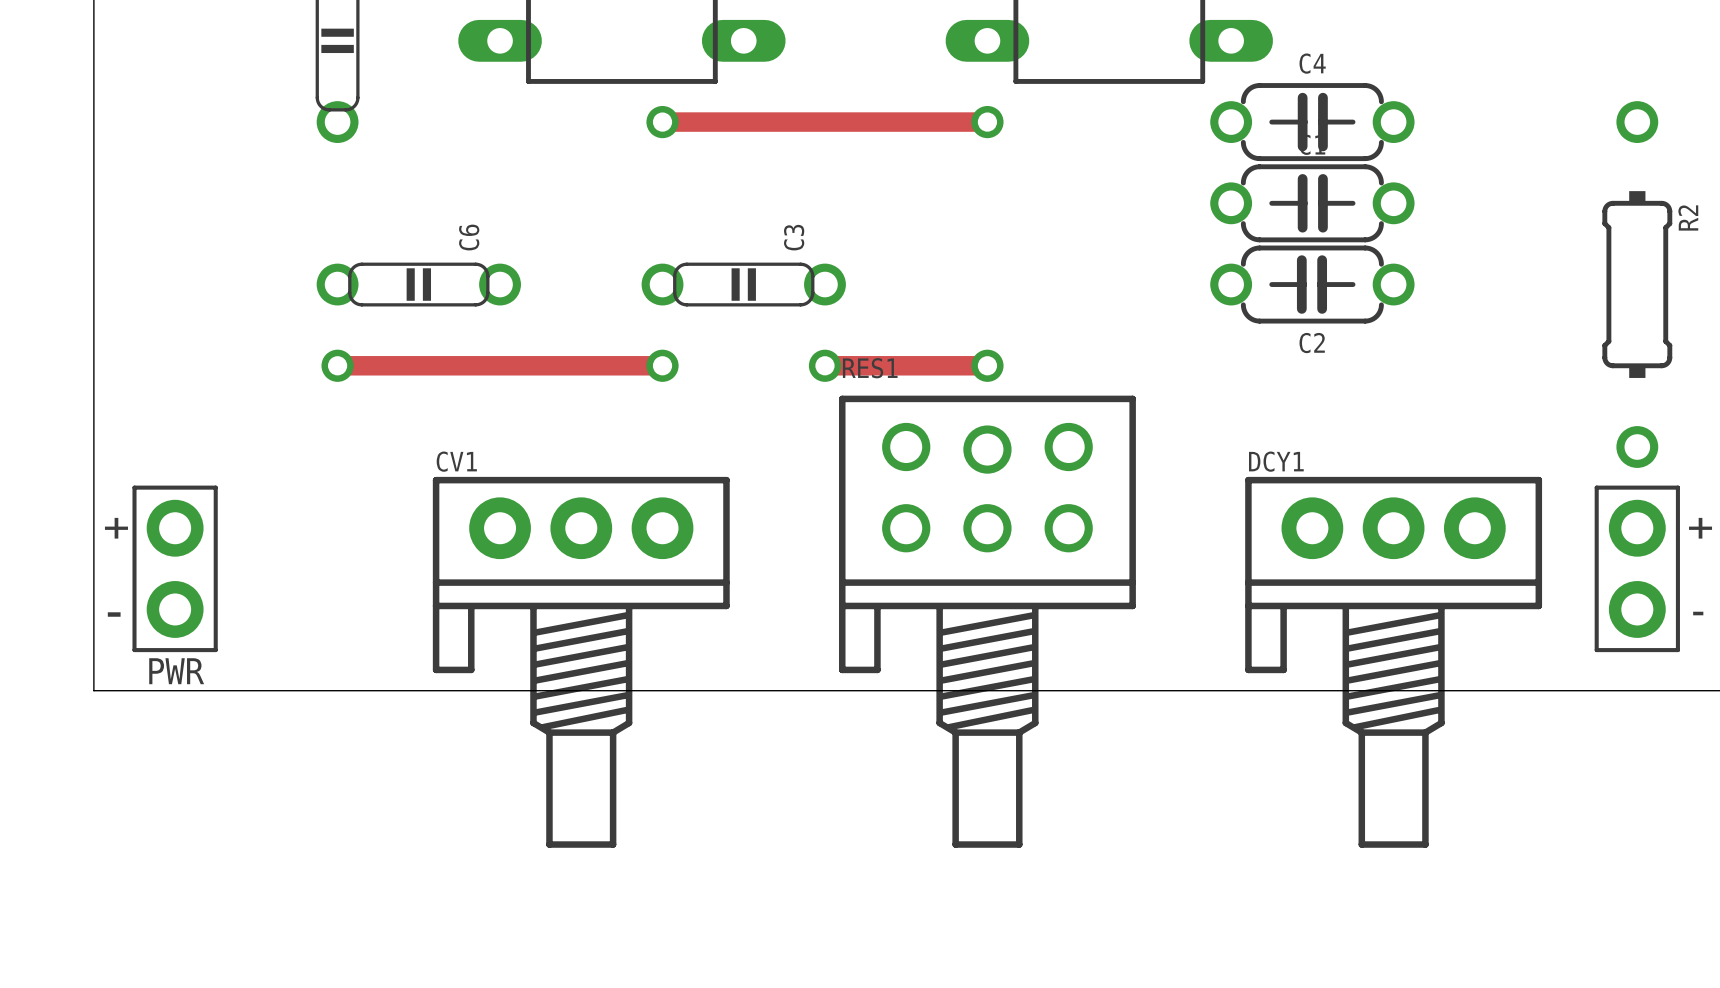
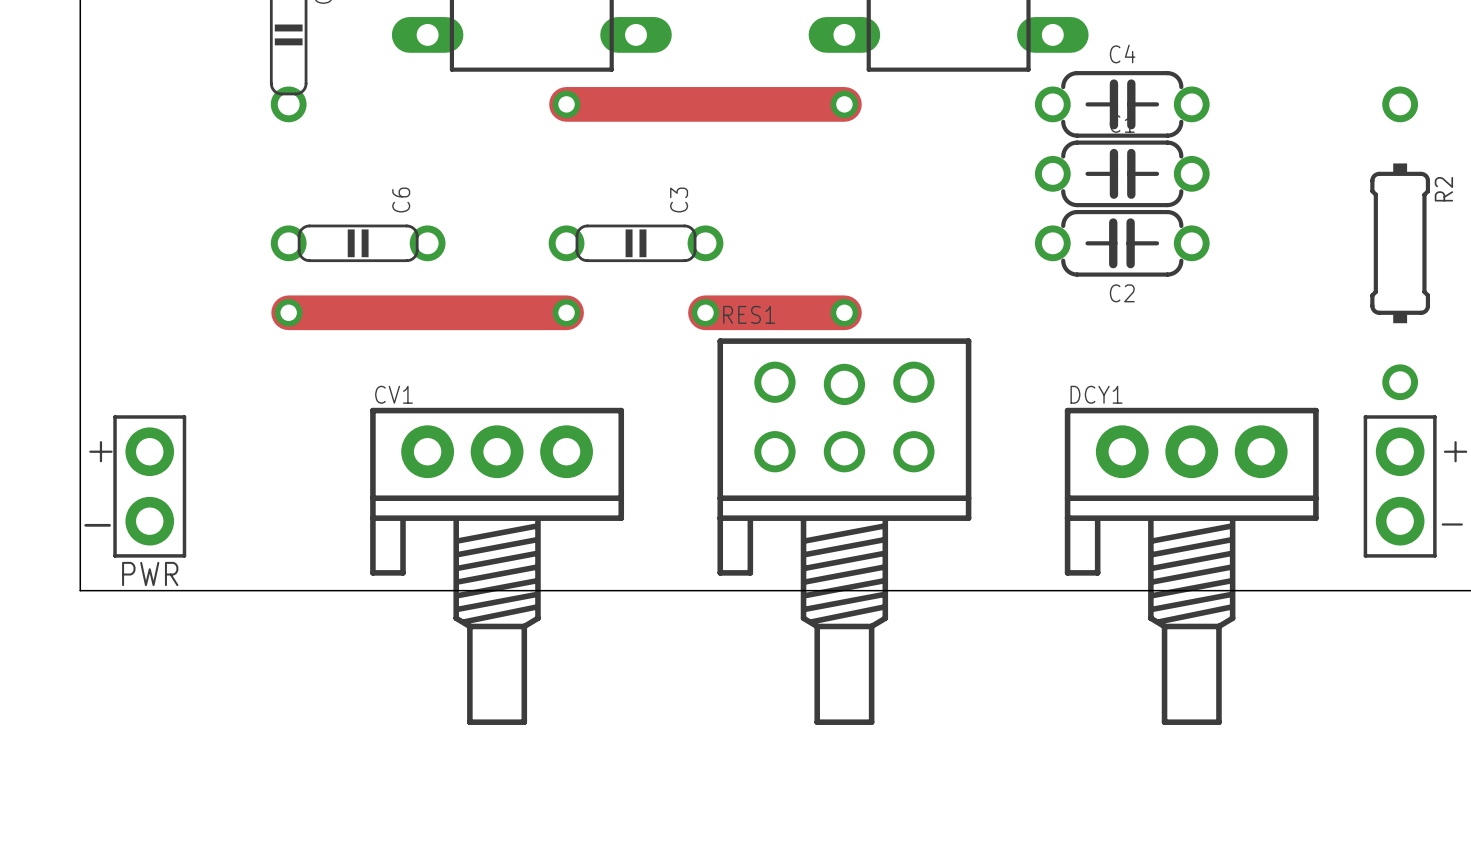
track width: thin (662, 122) (987, 122) -> thick (566, 104) (844, 104)
track width: thin (337, 365) (662, 365) -> thick (288, 312) (566, 312)
track width: thin (824, 365) (987, 365) -> thick (705, 312) (844, 312)

